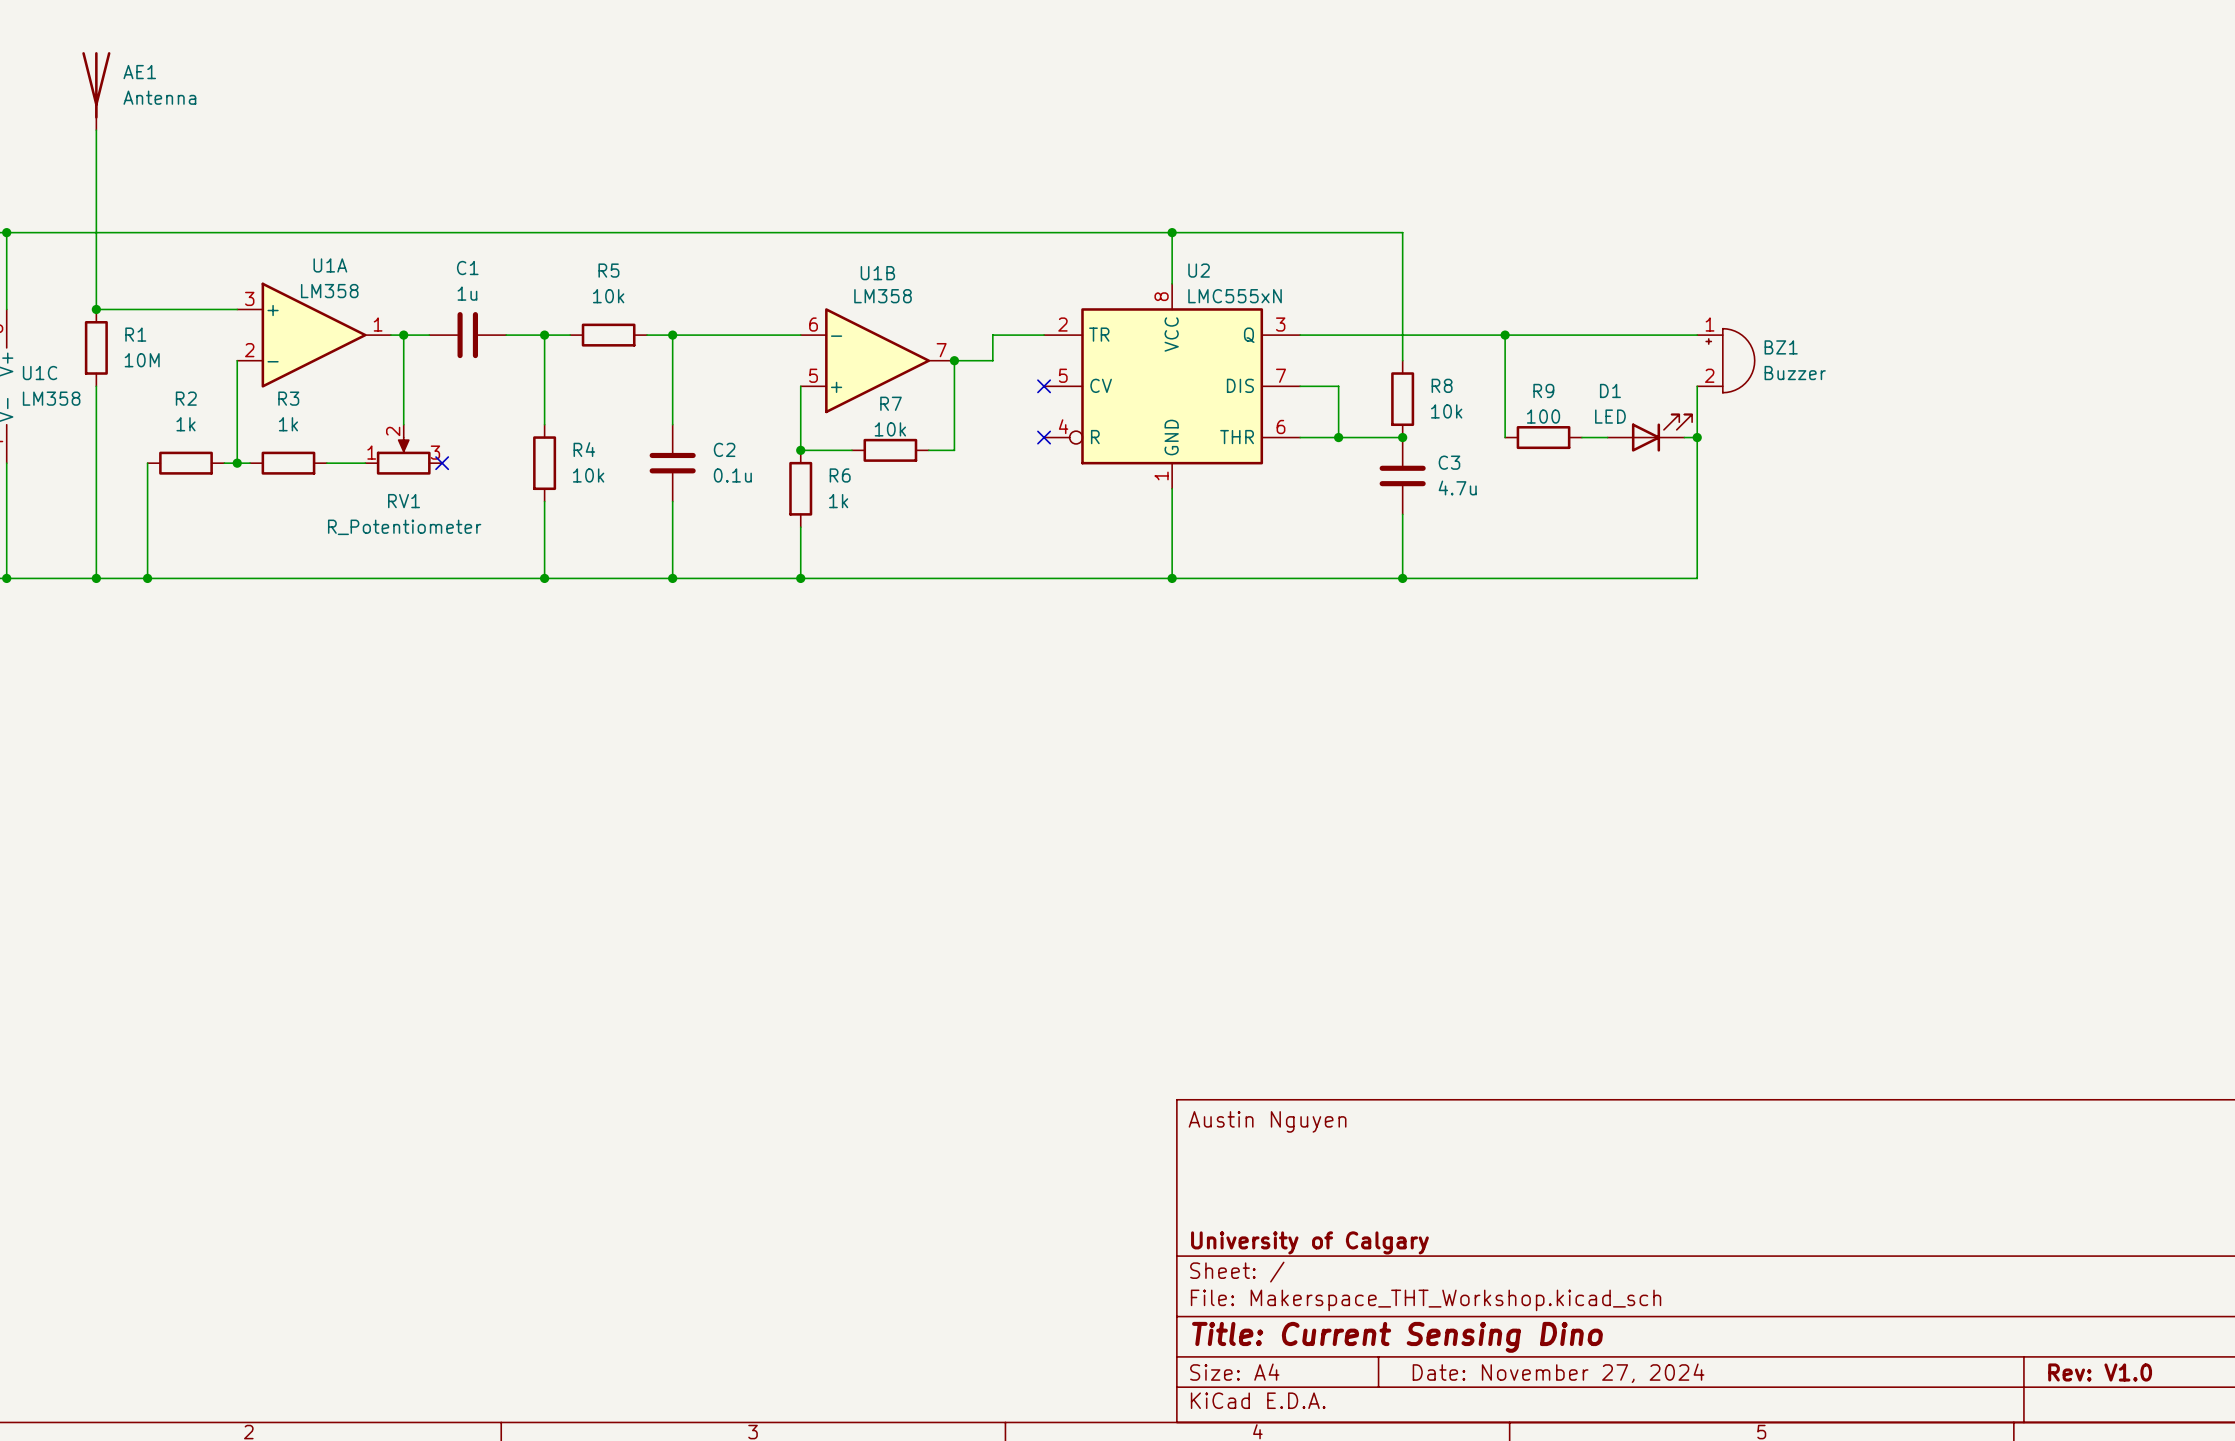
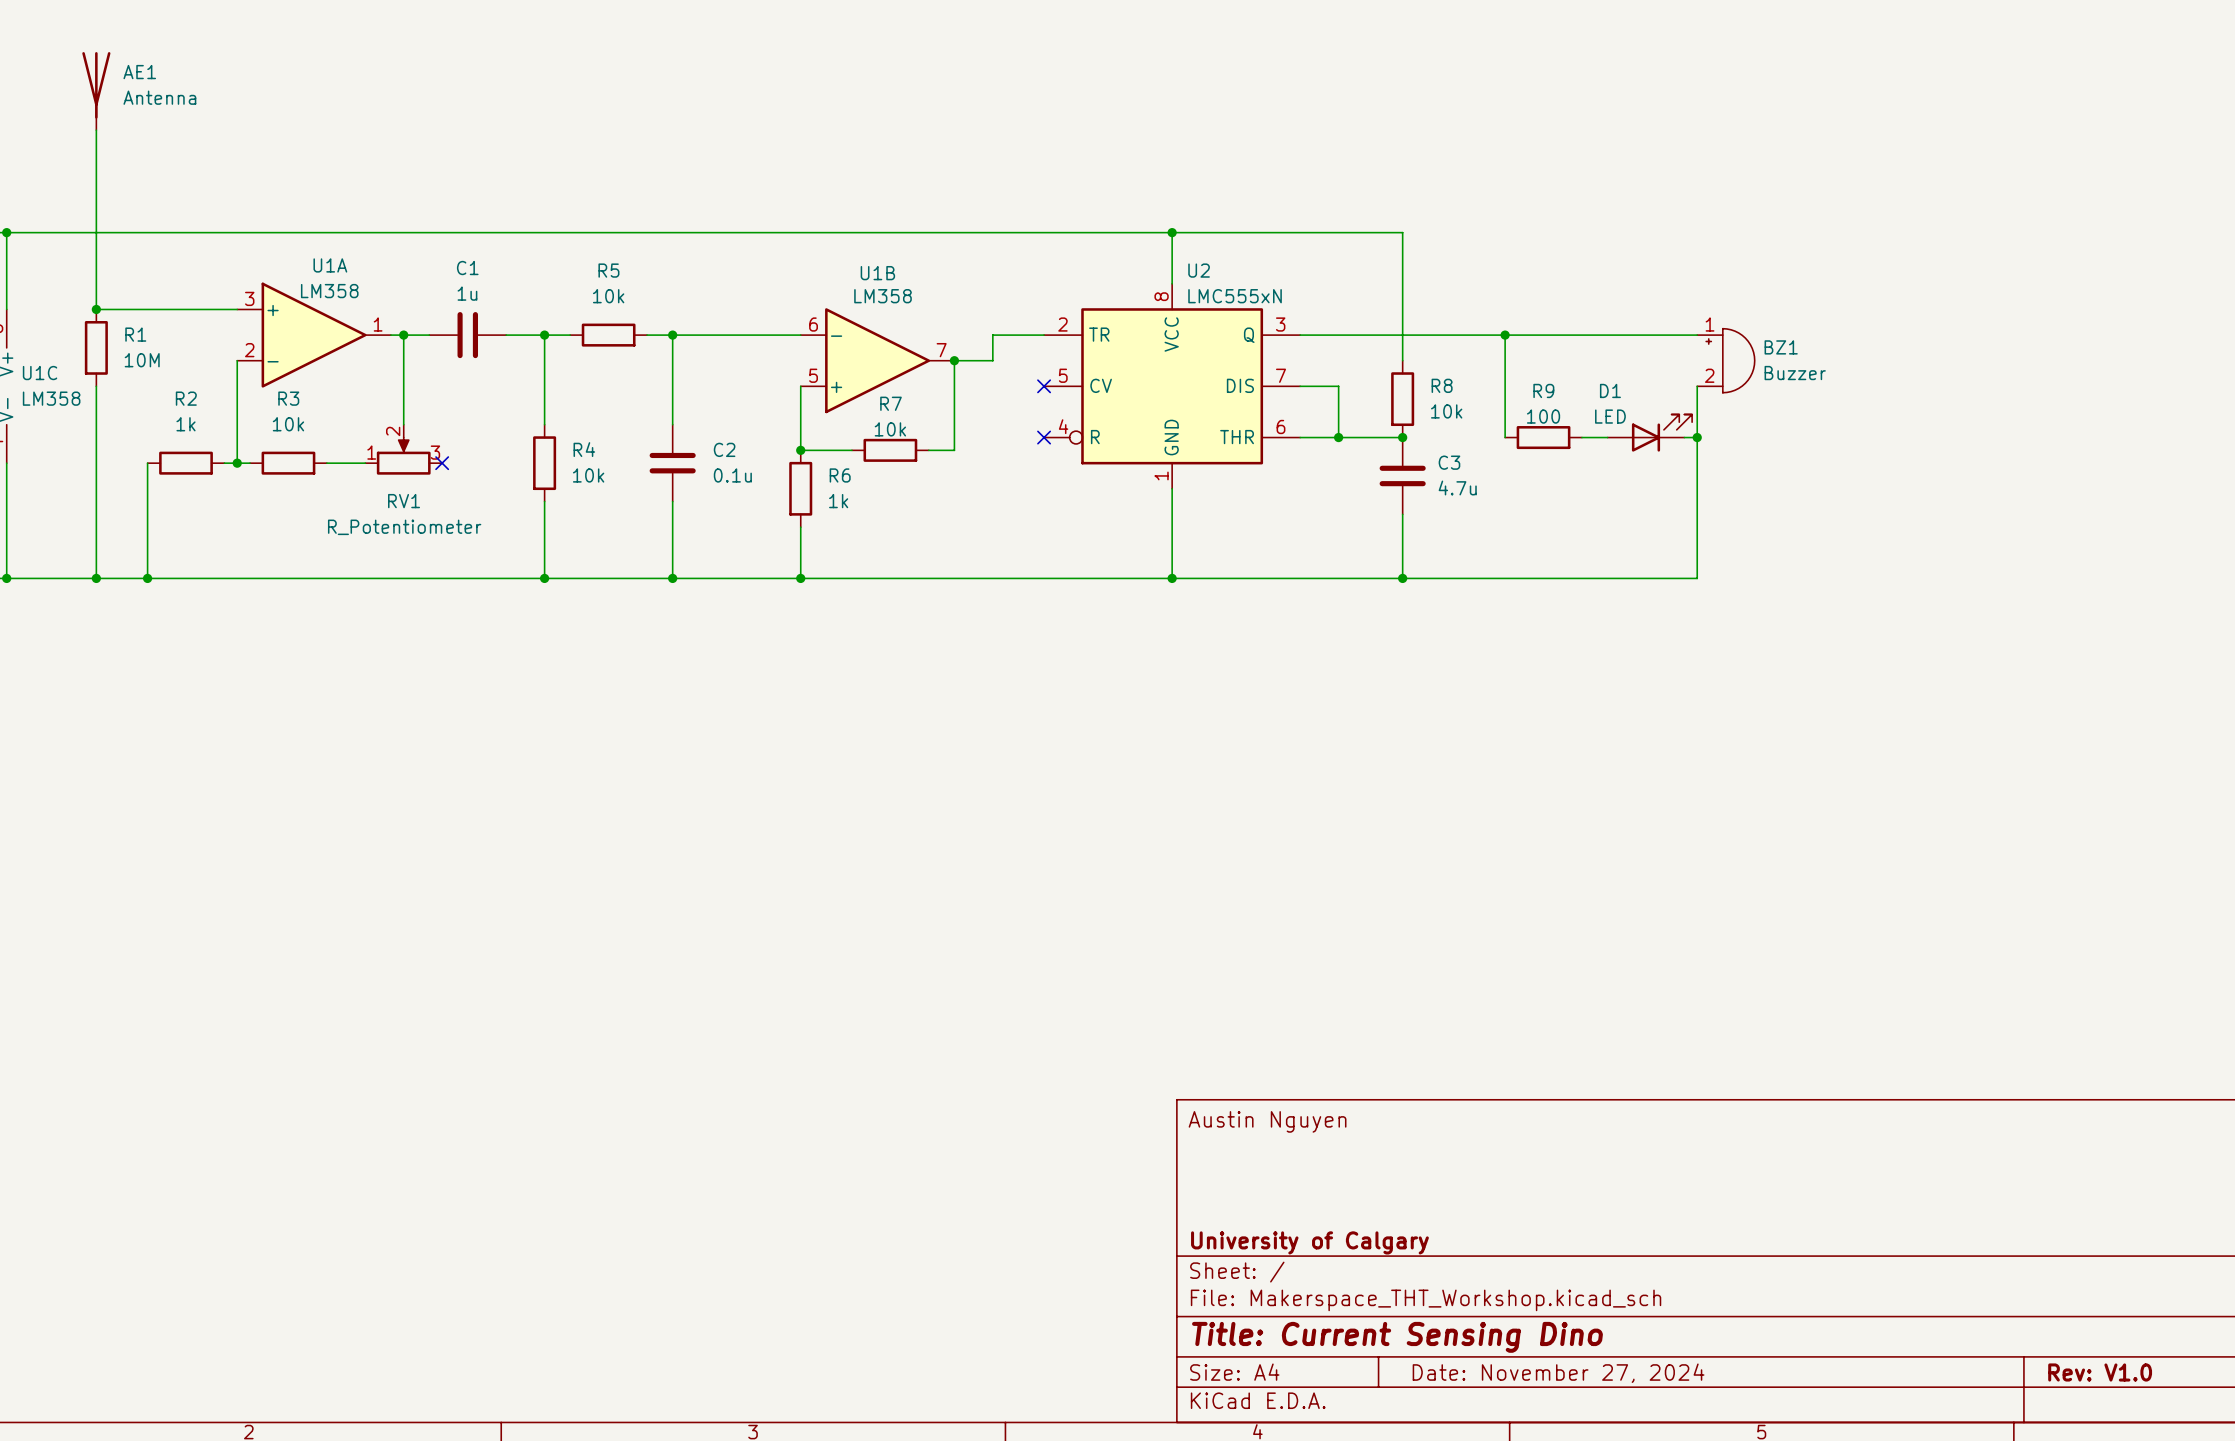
R3 value: 1k (288, 424) -> 10k (288, 424)

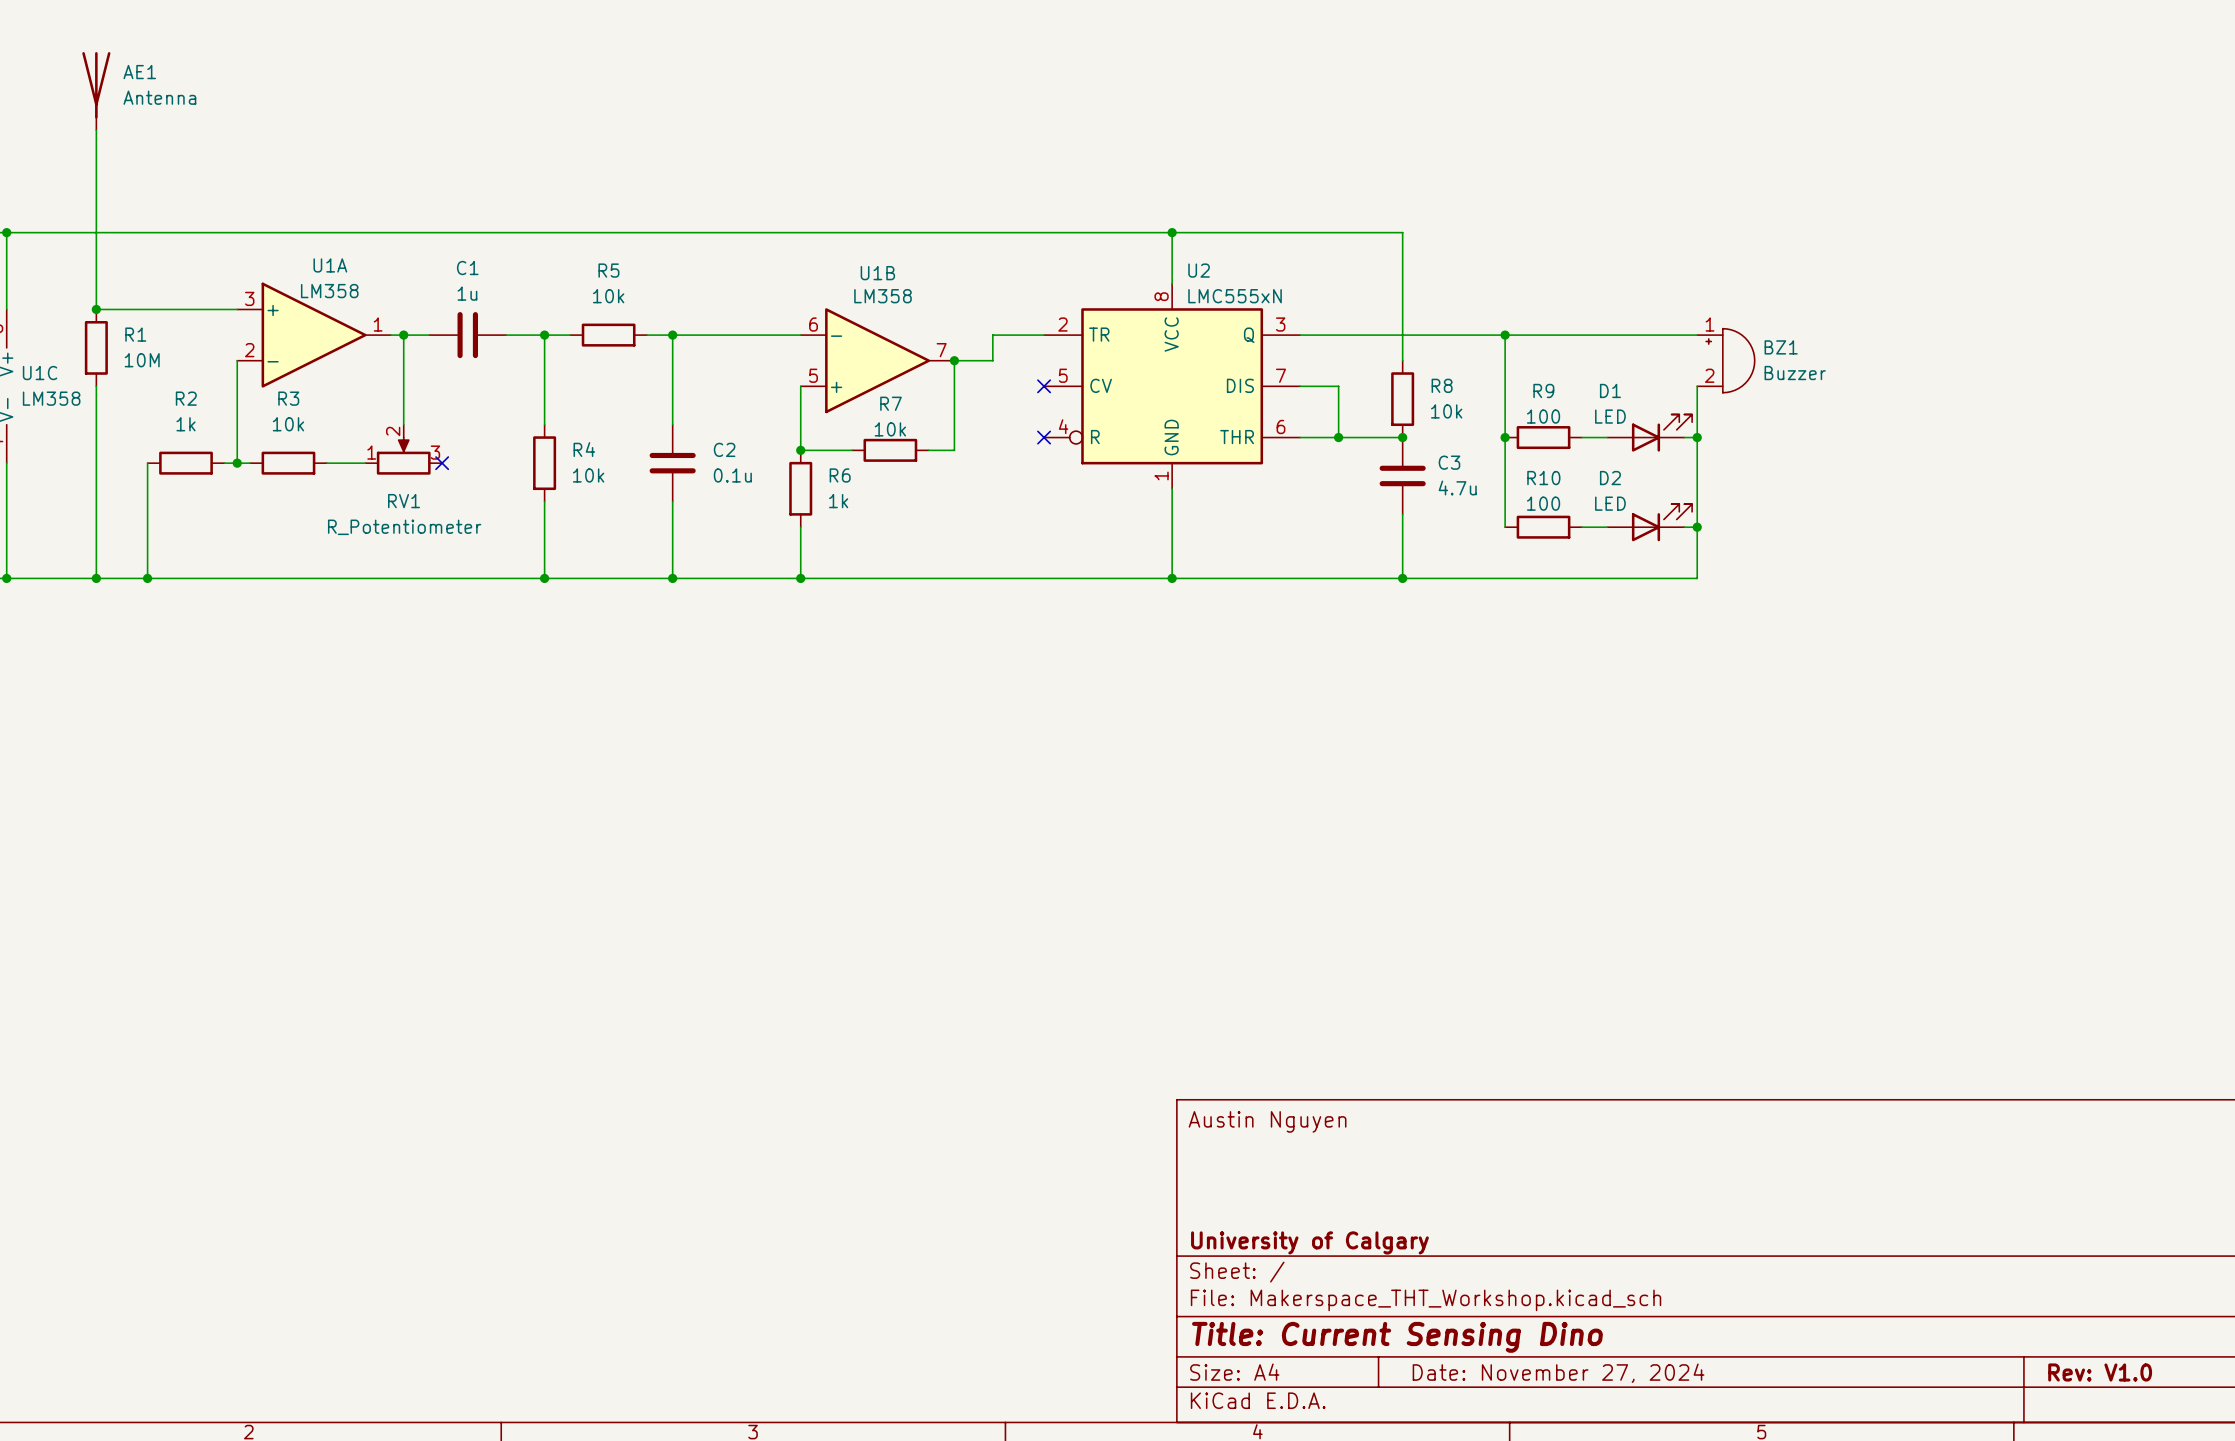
wire: none -> (1505, 437) (1505, 527)
junction: none -> (1505, 437)
D2: none -> LED (1649, 522)
R10: none -> 100 (1543, 527)
wire: none -> (1581, 527) (1607, 527)
wire: none -> (1684, 527) (1697, 527)
junction: none -> (1697, 527)

